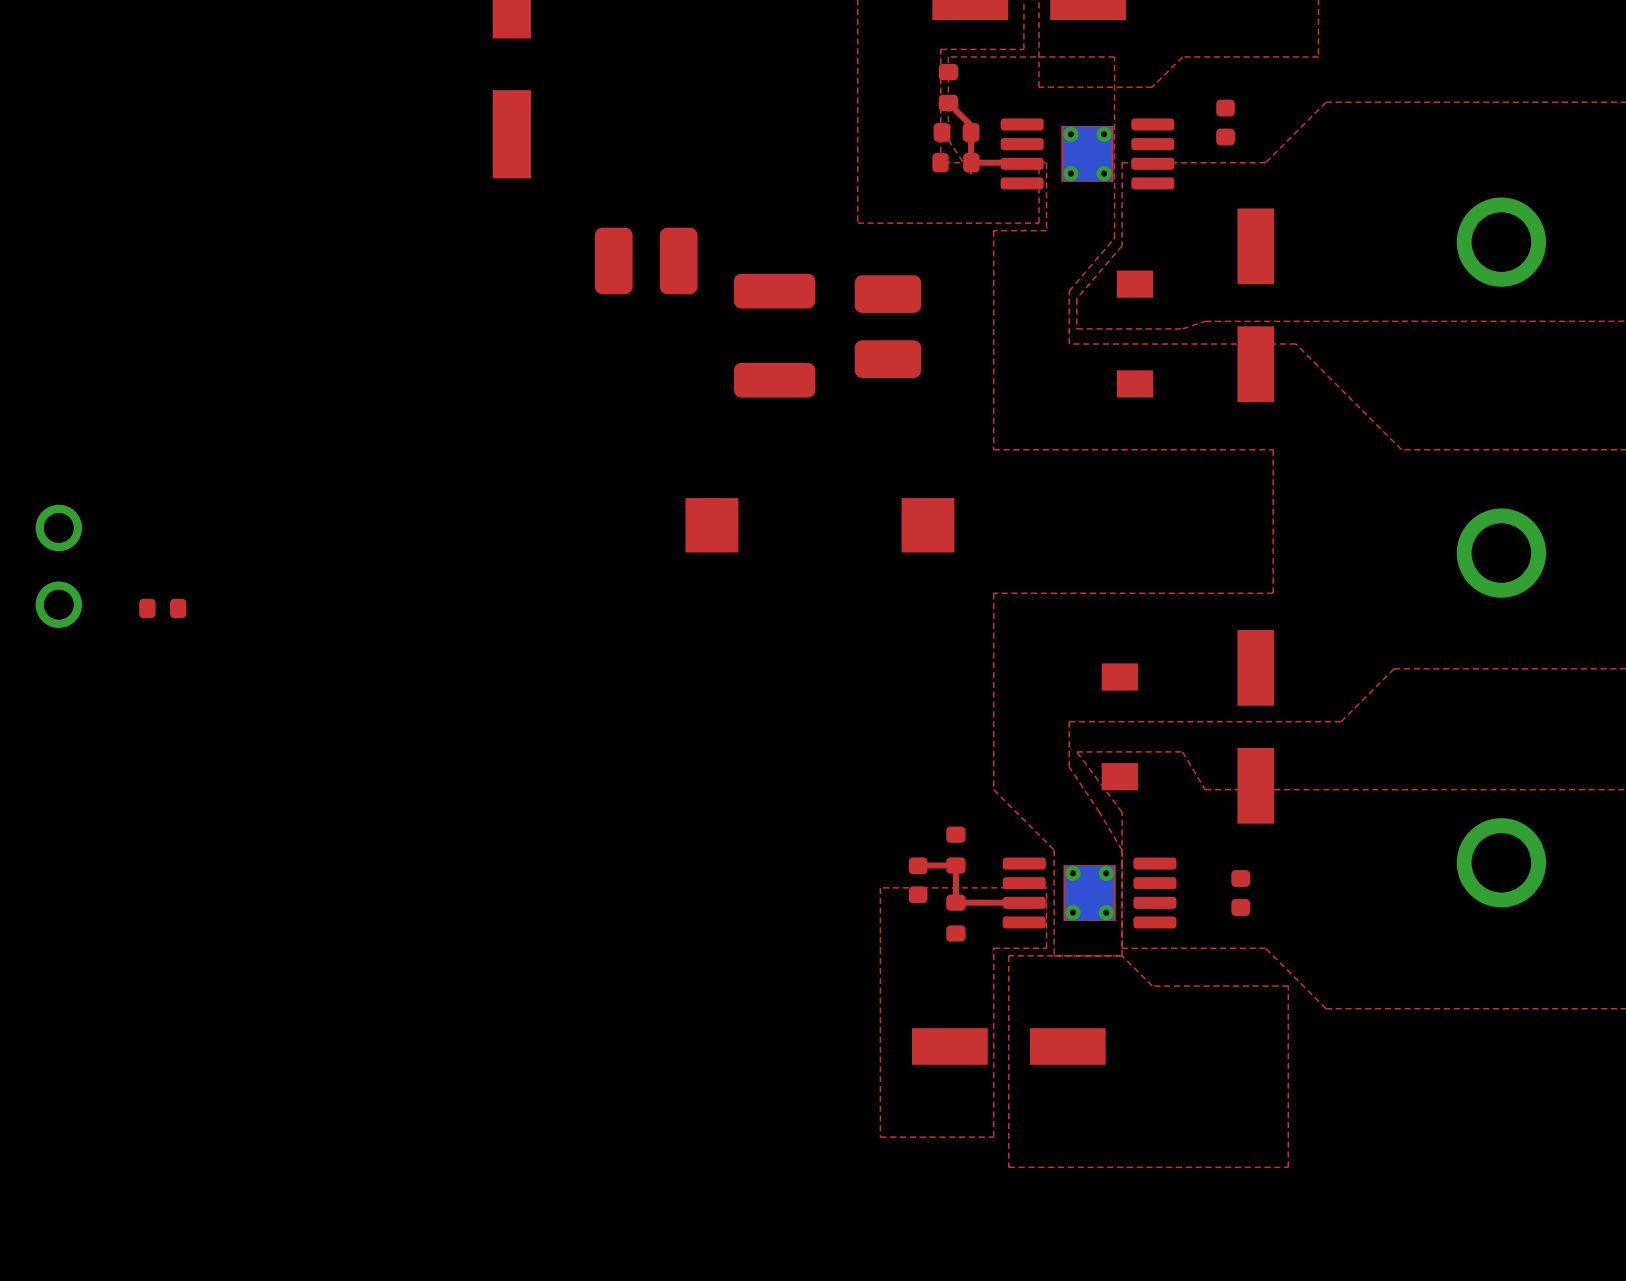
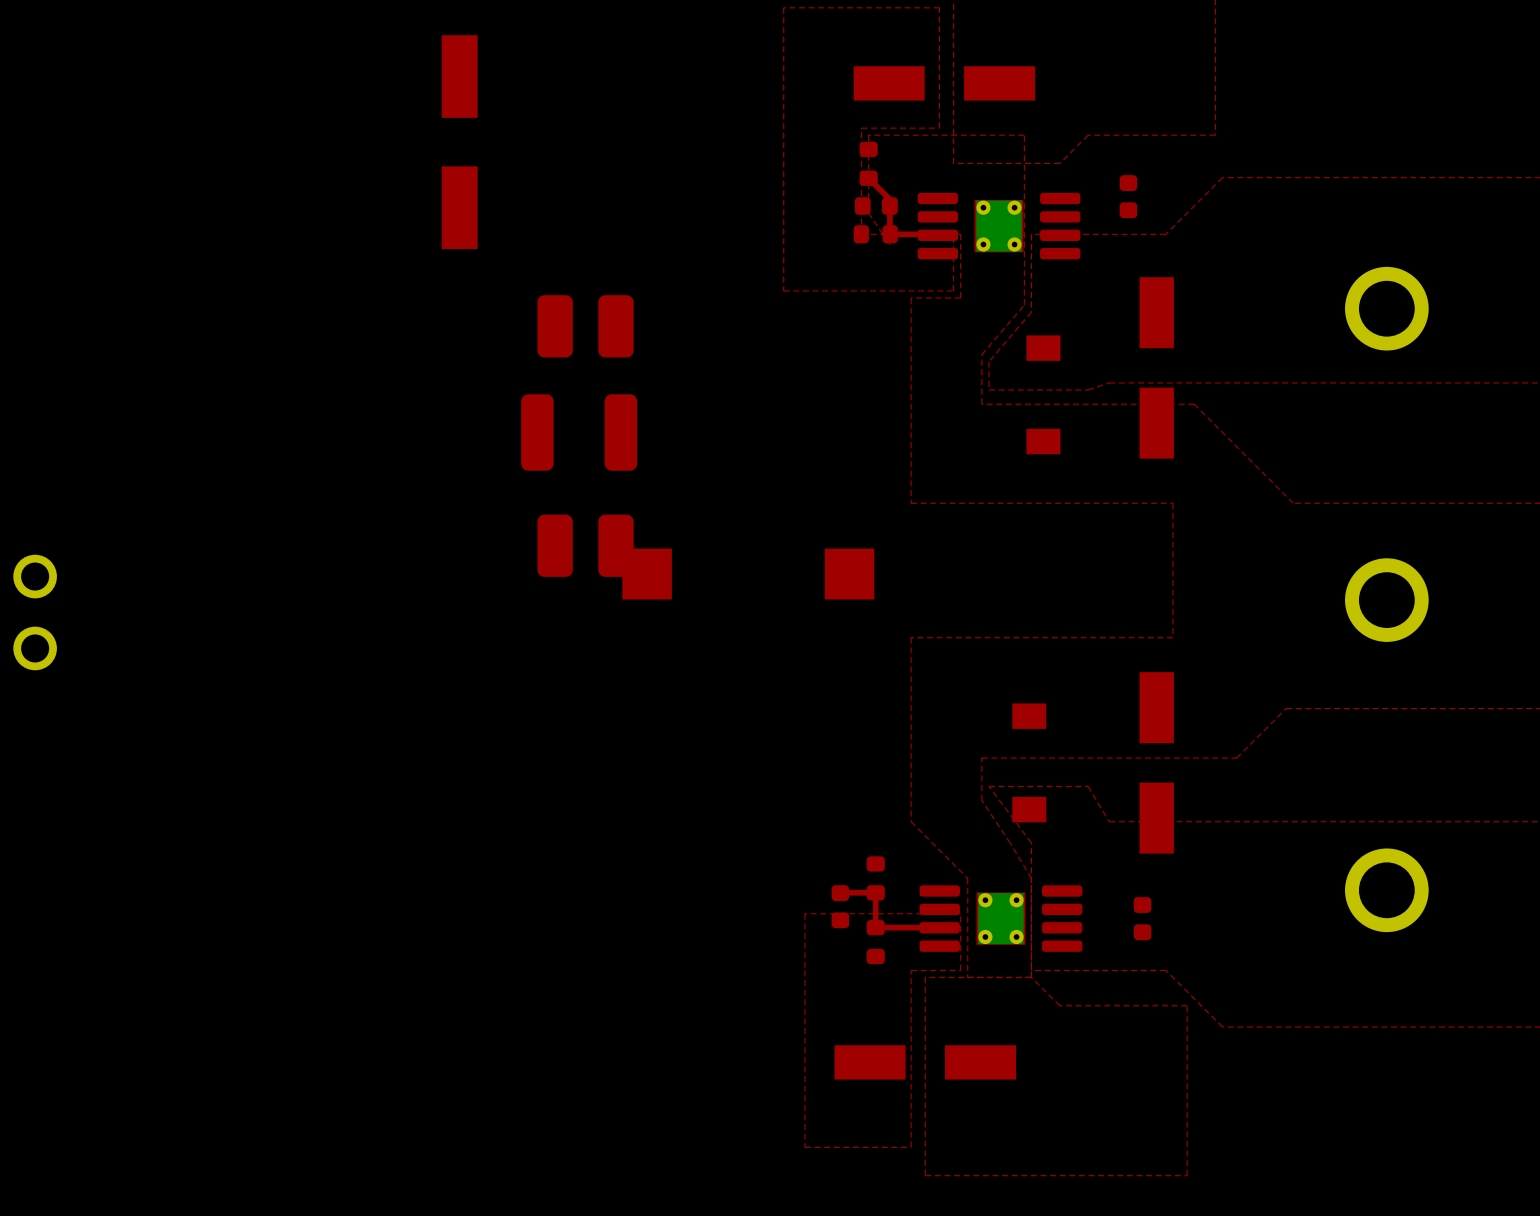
part rotation: 0° (887, 326) -> 90° clockwise (585, 545)
part position: (887, 326) -> (585, 545)
part rotation: 0° (774, 335) -> 90° clockwise (579, 432)
part position: (774, 335) -> (579, 432)
part: (162, 608) -> none

